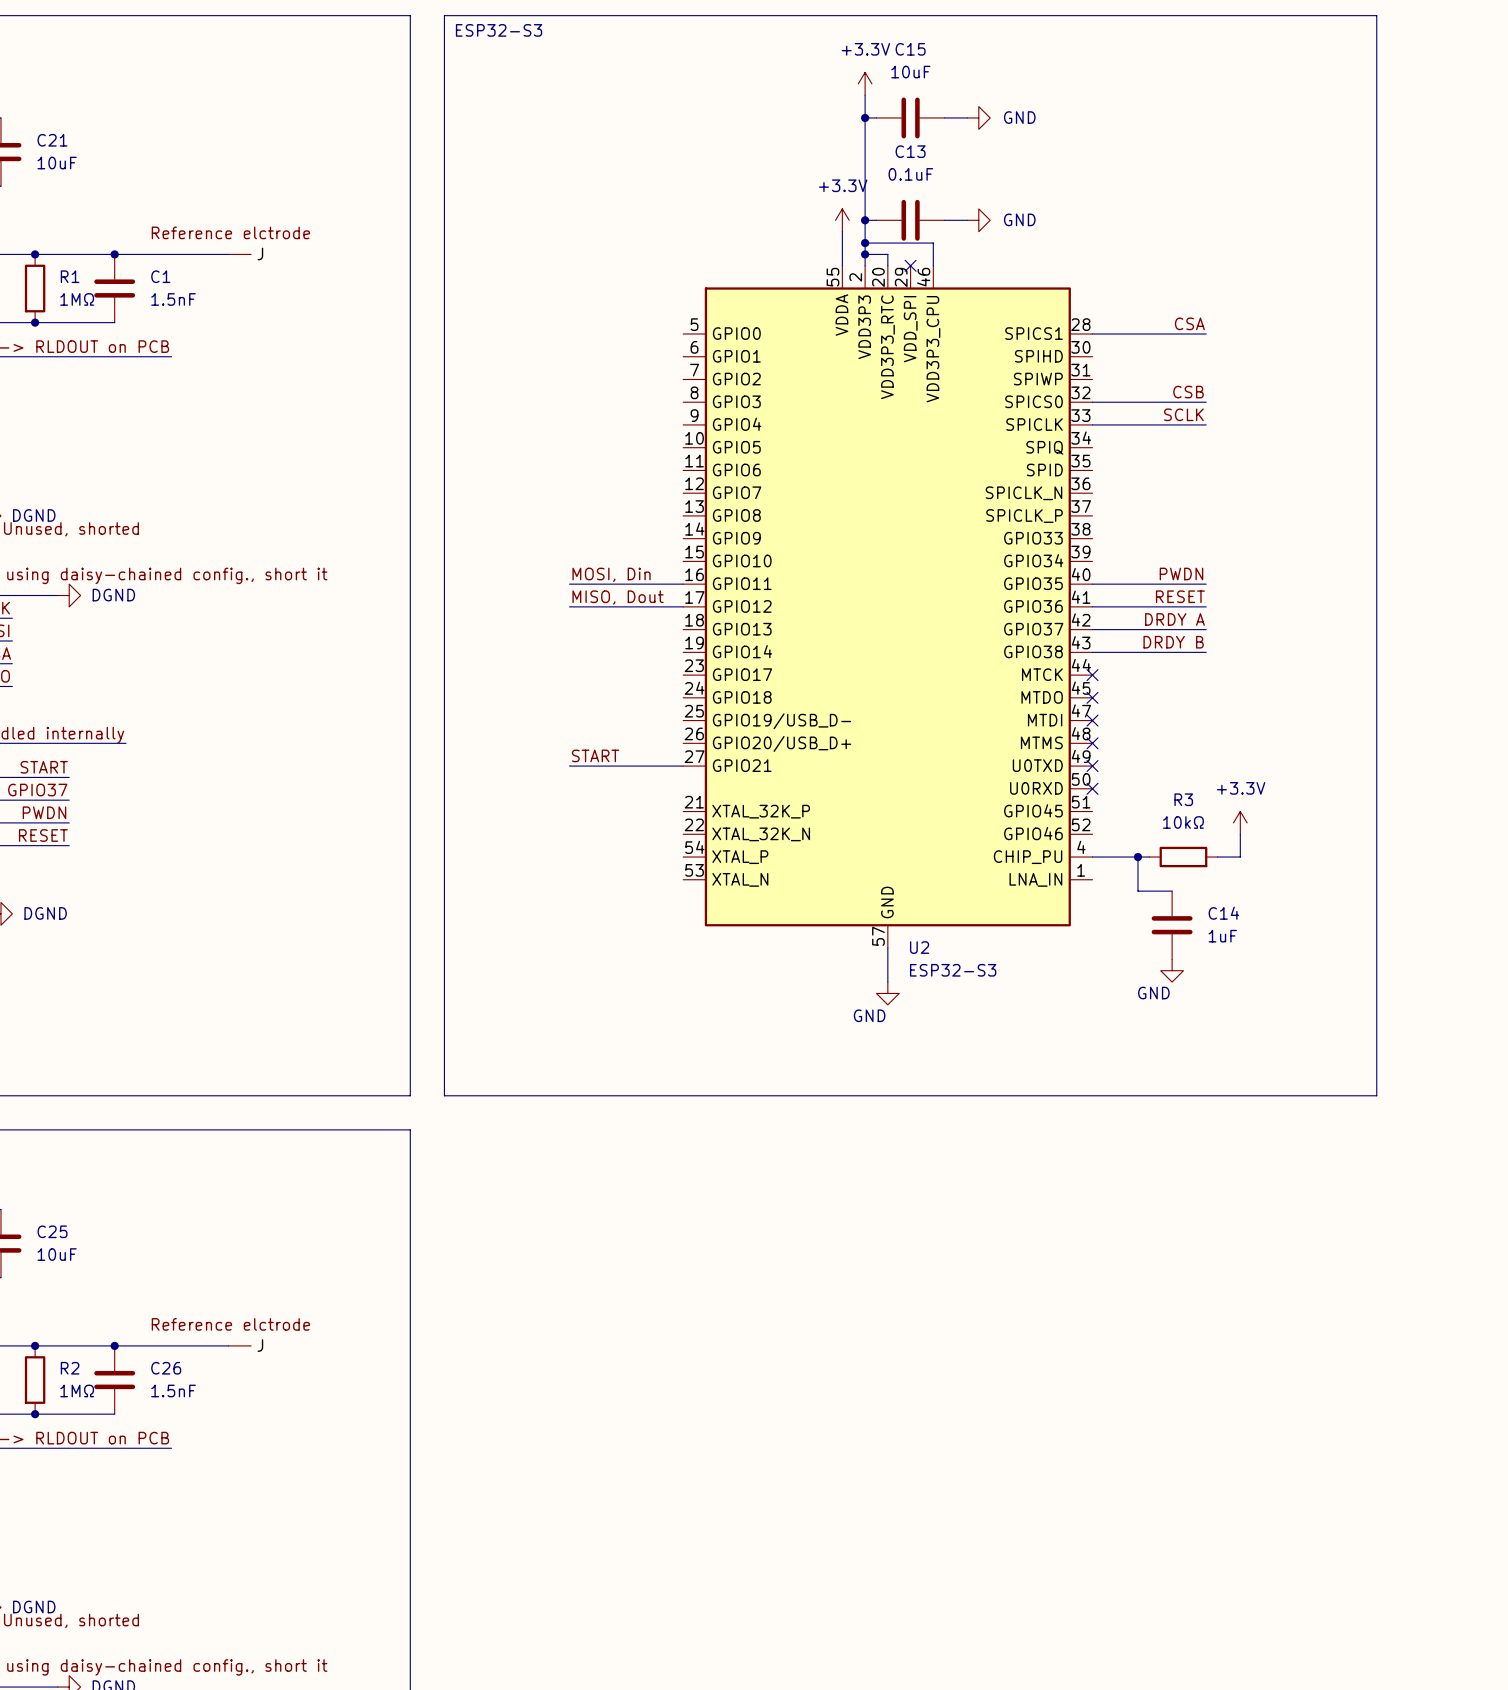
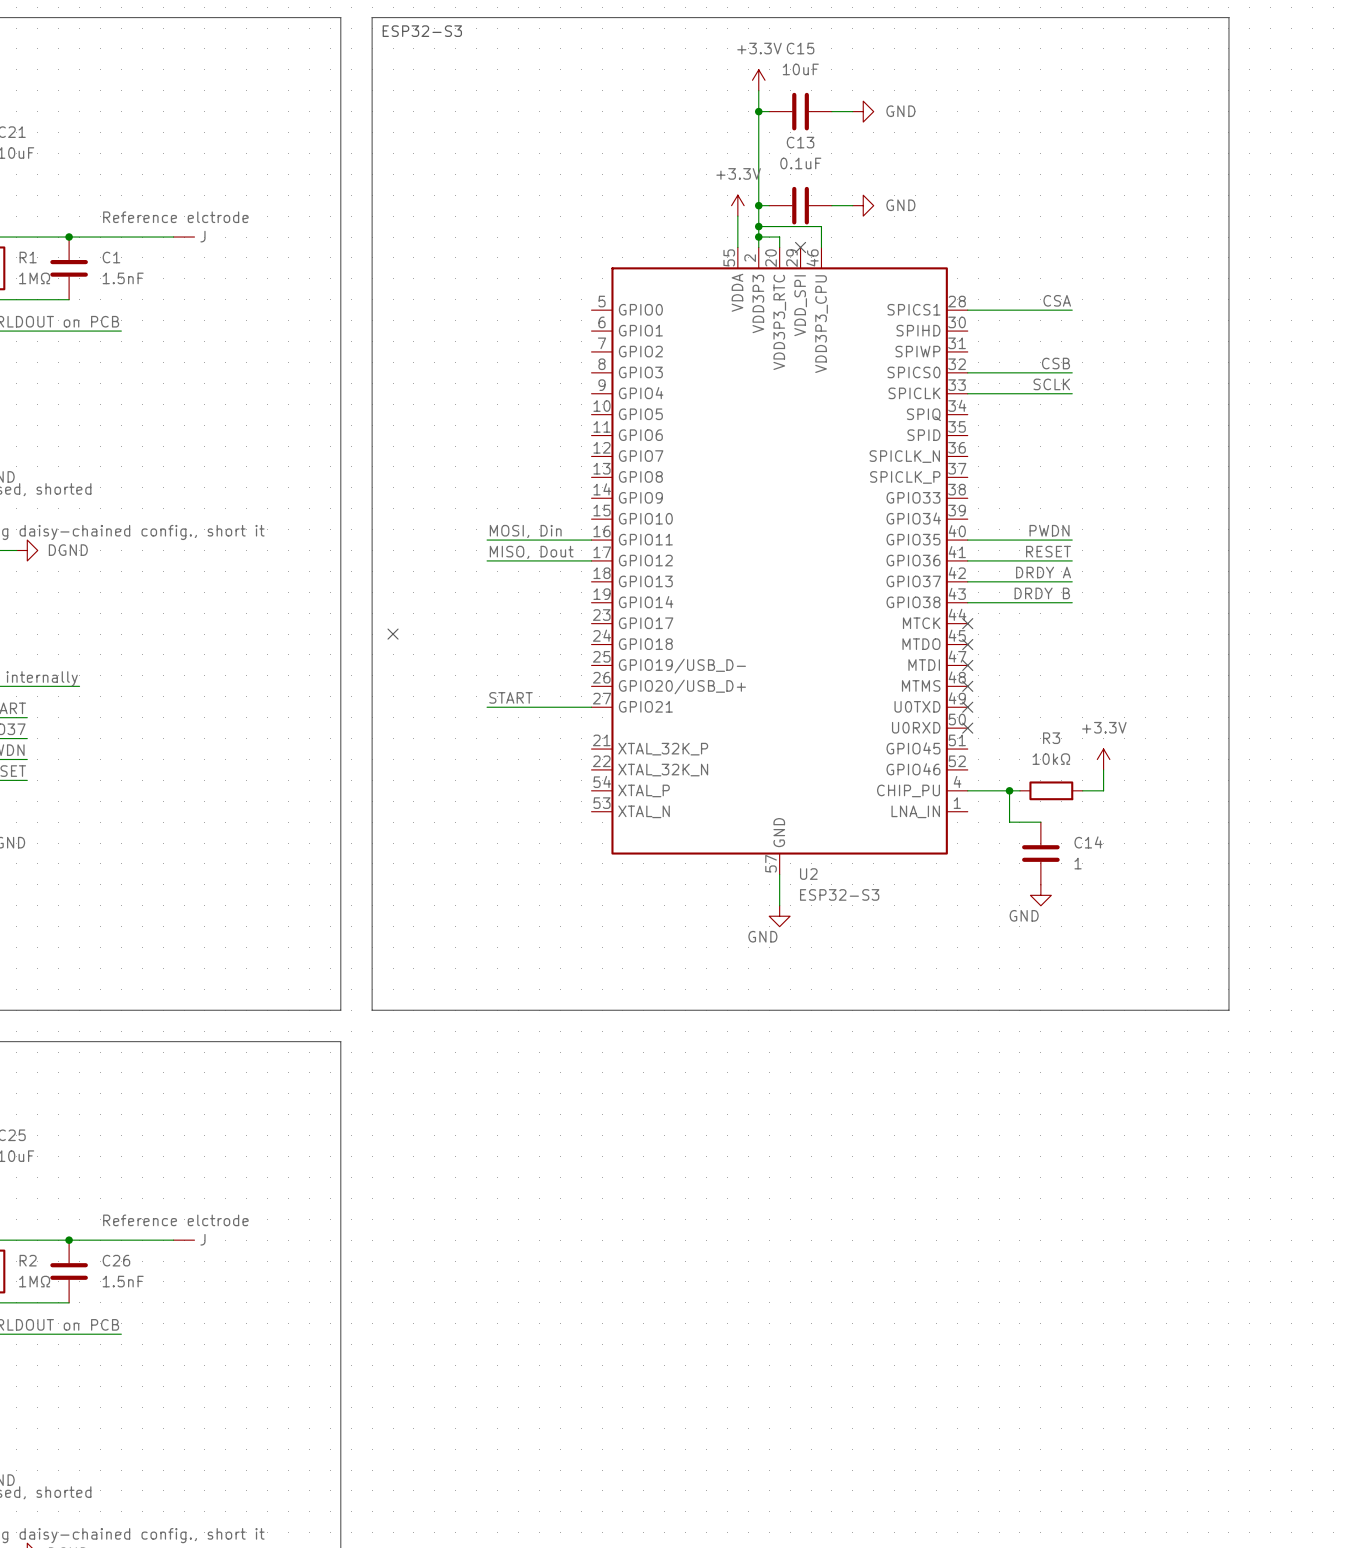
no-connect mark: none -> (393, 634)
C14 value: 1uF (1222, 936) -> 1 (1078, 863)

